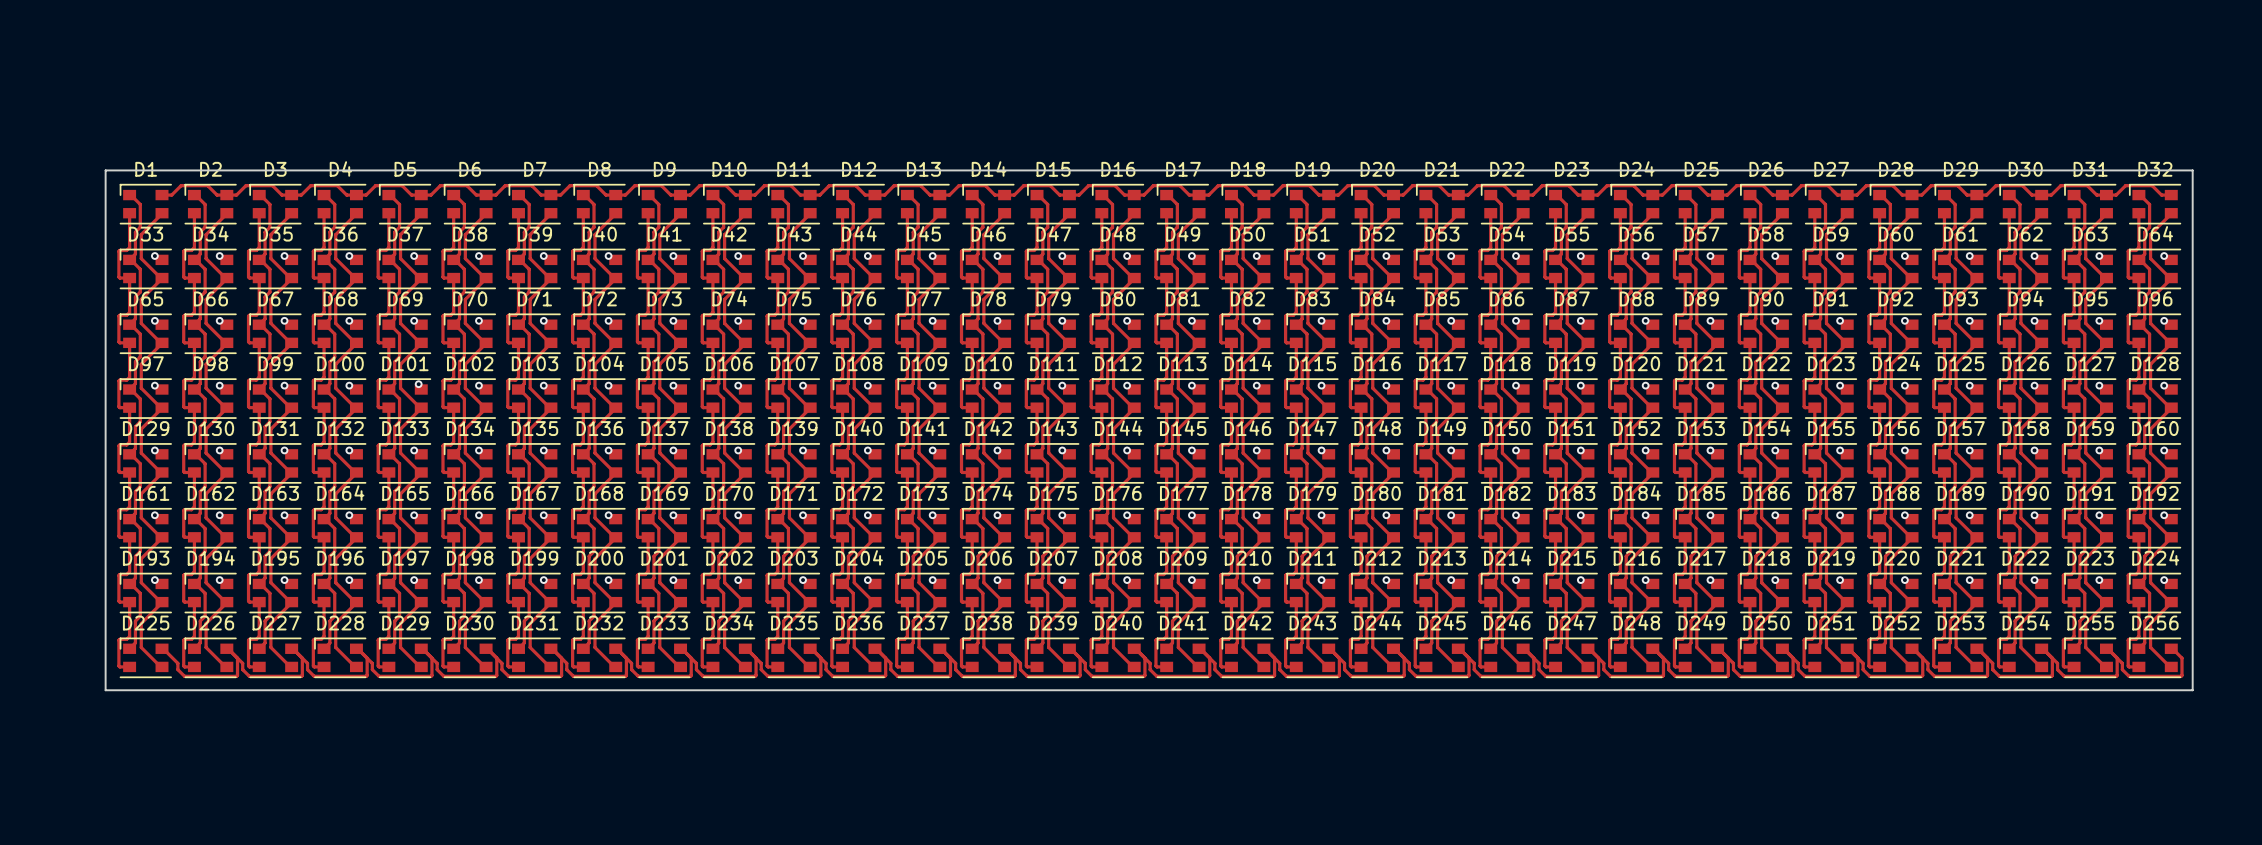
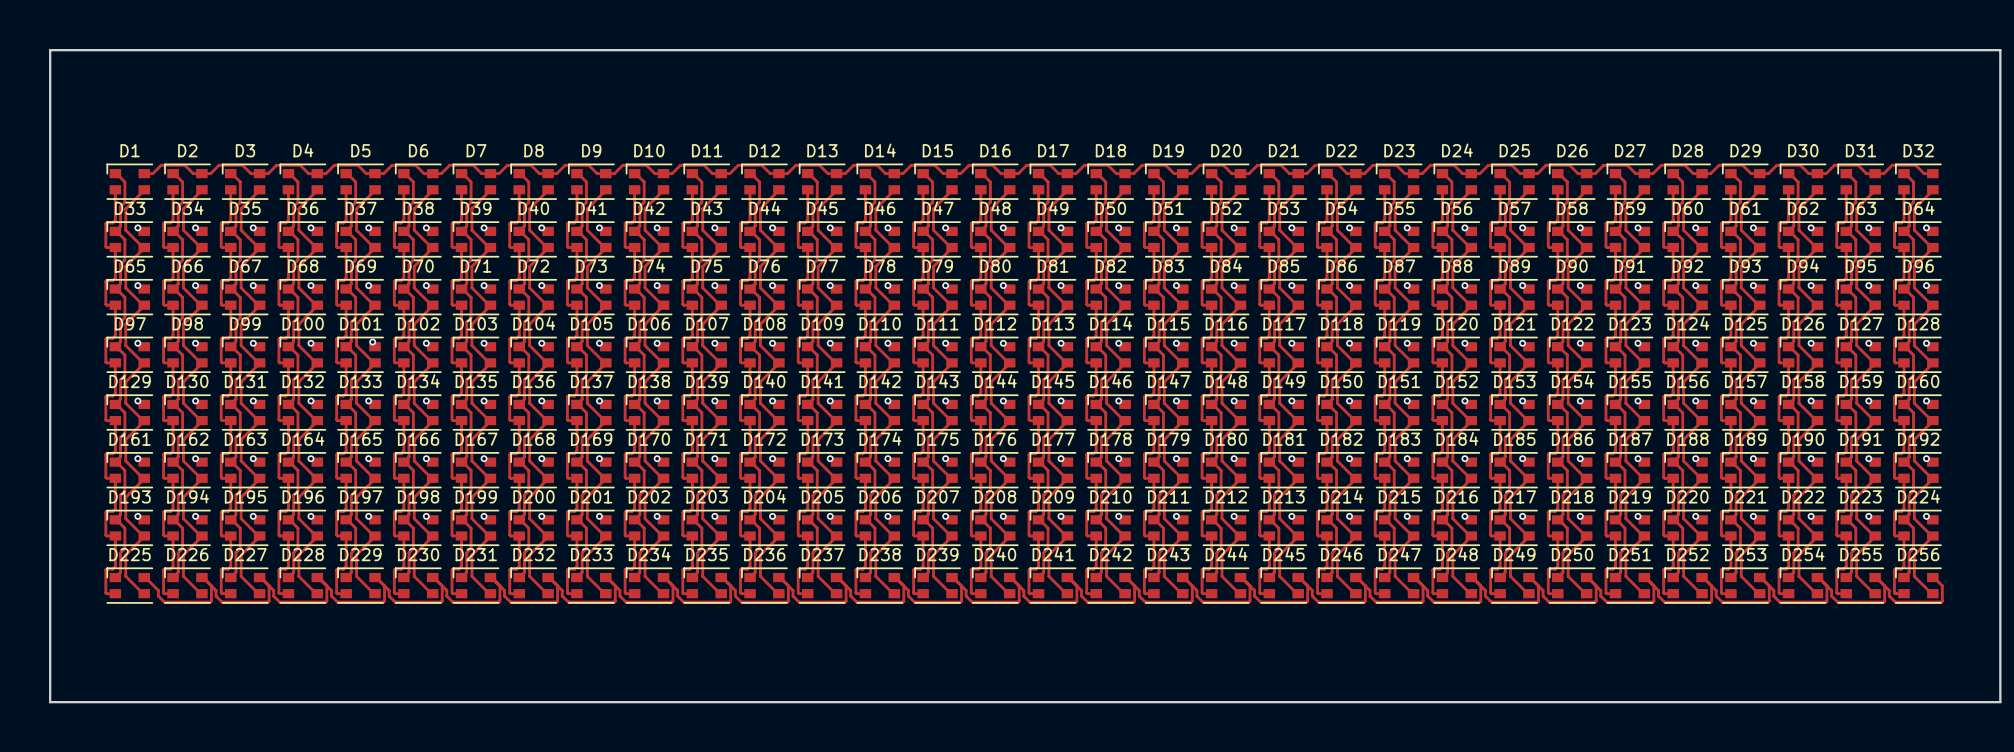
board edge: (105, 170) (105, 690) (2192, 690) (2192, 170) (105, 170) -> (50, 50) (50, 702) (2000, 702) (2000, 50) (50, 50)

